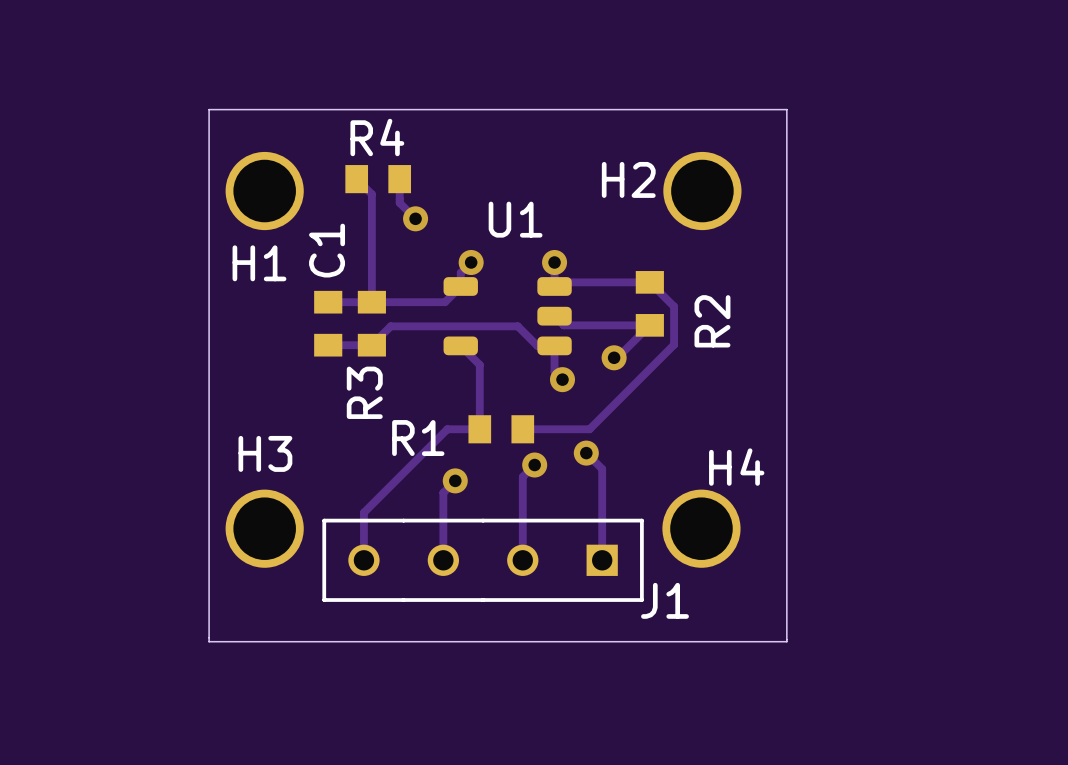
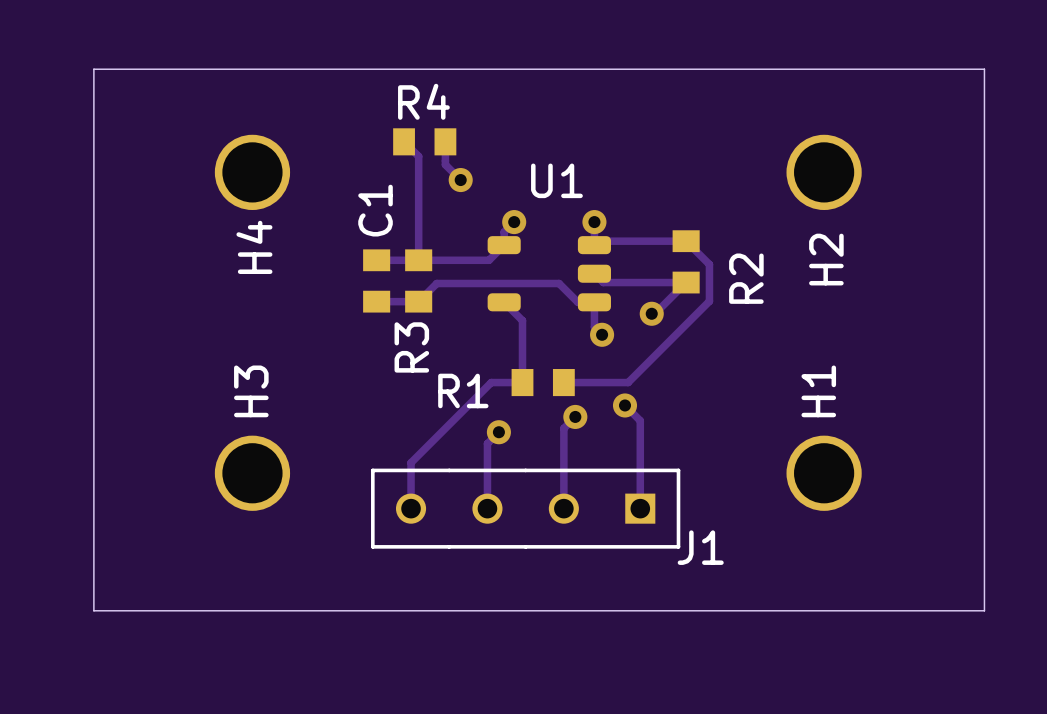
board edge: (209, 109) (209, 641) (786, 641) (786, 109) (209, 109) -> (93, 69) (93, 610) (984, 610) (984, 69) (93, 69)
H2 name rotation: 0° (628, 179) -> 90° counterclockwise (826, 259)
H2 name position: H2 (628, 179) -> H2 (826, 259)
H1 position: (264, 191) -> (824, 473)
H2 position: (702, 191) -> (824, 172)
H1 name rotation: 0° (259, 263) -> 90° counterclockwise (818, 391)
H1 name position: H1 (259, 263) -> H1 (818, 391)
H3 name rotation: 0° (265, 453) -> 90° counterclockwise (251, 391)
H4 name rotation: 0° (736, 467) -> 90° counterclockwise (254, 247)
H4 name position: H4 (736, 467) -> H4 (254, 247)
H3 position: (264, 528) -> (252, 473)
H4 position: (701, 528) -> (252, 172)

